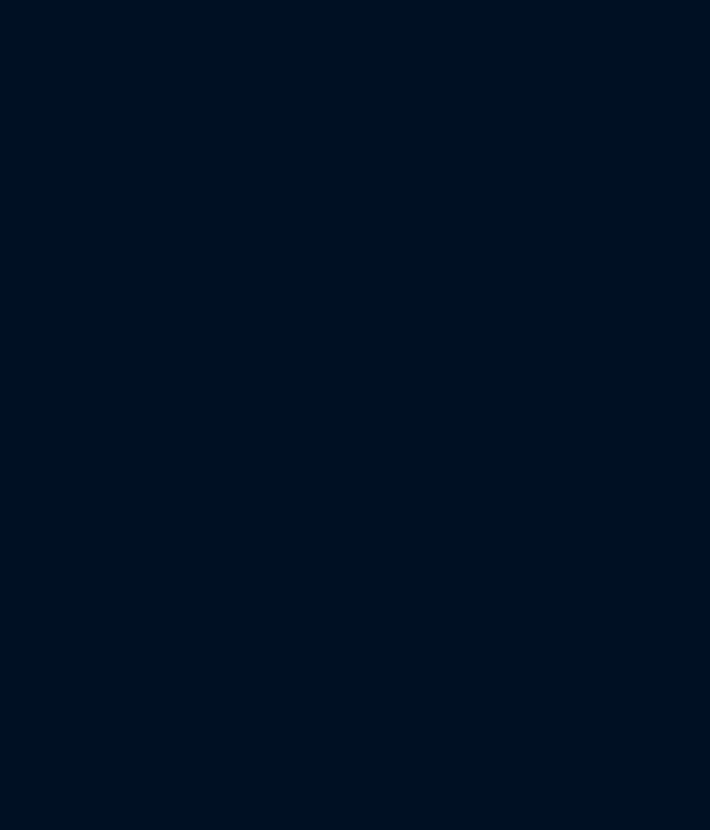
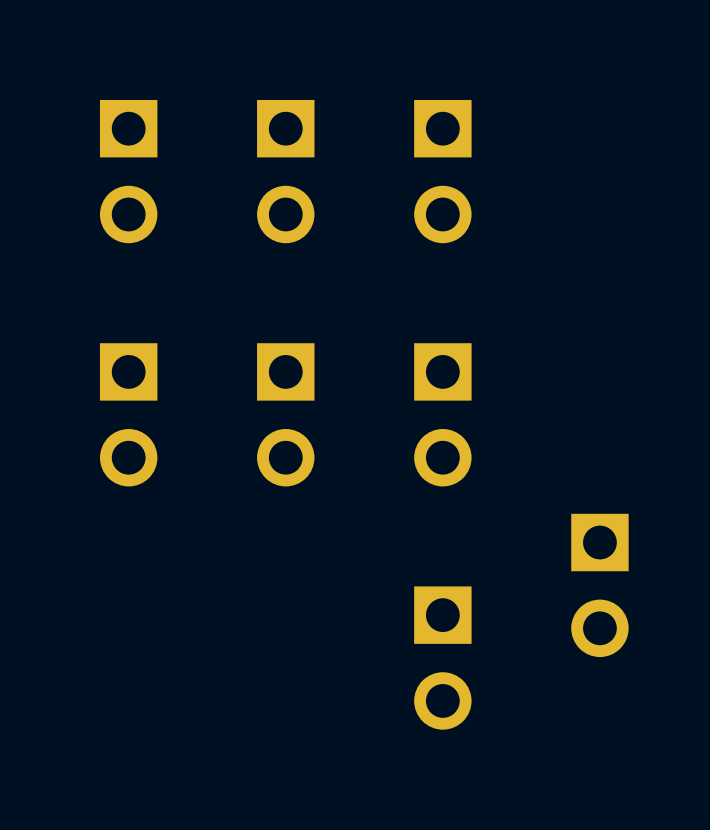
part: none -> (128, 171)
part: none -> (285, 171)
part: none -> (442, 171)
part: none -> (128, 414)
part: none -> (285, 414)
part: none -> (442, 414)
part: none -> (599, 585)
part: none -> (442, 658)

